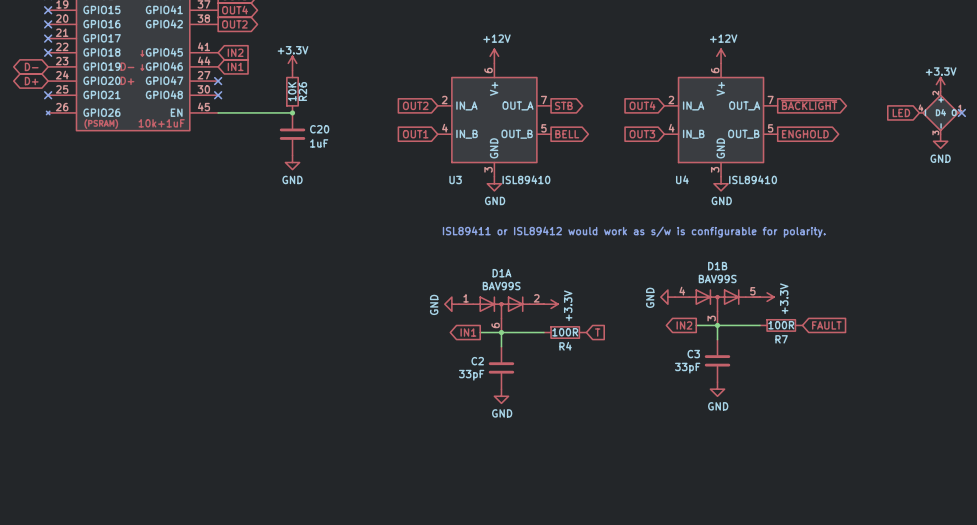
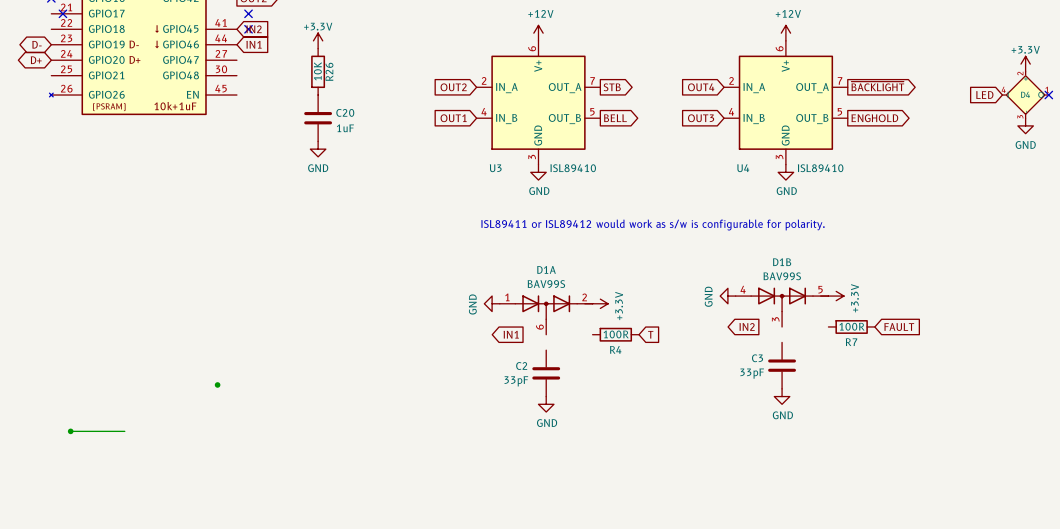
no-connect mark: (48, 38) -> none
no-connect mark: none -> (62, 13)
no-connect mark: none -> (248, 13)
no-connect mark: (48, 52) -> none
no-connect mark: none -> (248, 29)
no-connect mark: (218, 81) -> none
no-connect mark: (48, 95) -> none
no-connect mark: (218, 95) -> none
wire: (218, 112) (292, 112) -> none
junction: (292, 112) -> none
wire: (696, 325) (760, 325) -> none
wire: (717, 325) (717, 339) -> none
junction: (717, 325) -> none
wire: (480, 332) (543, 332) -> none
wire: (501, 332) (501, 346) -> none
junction: (501, 332) -> none
junction: none -> (217, 384)
wire: none -> (70, 431) (124, 431)
junction: none -> (70, 431)

